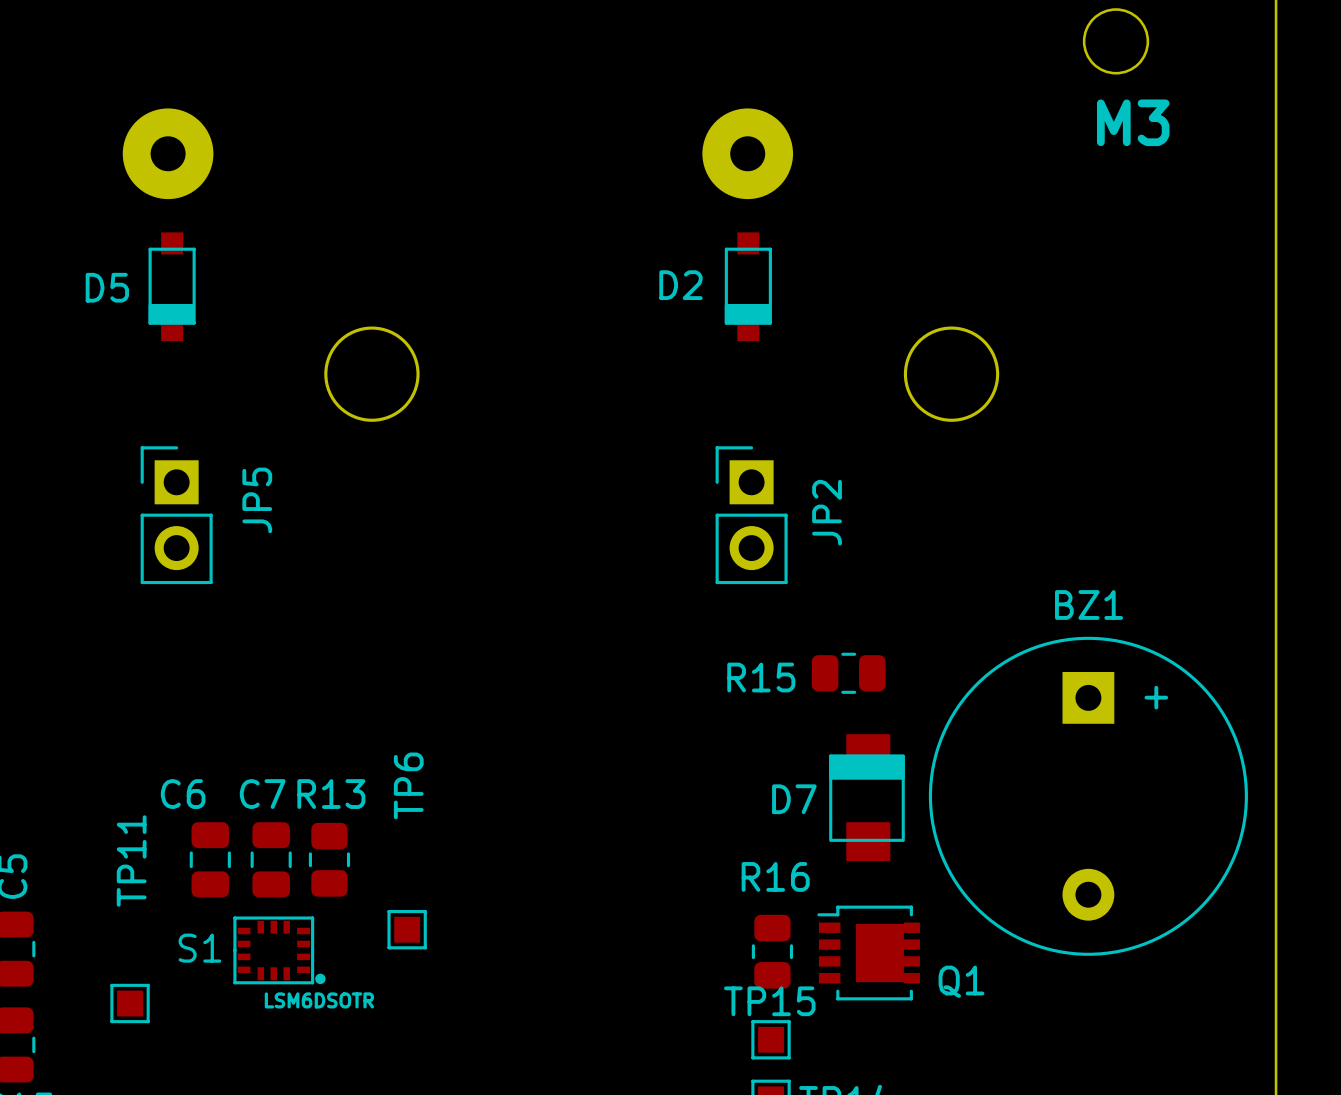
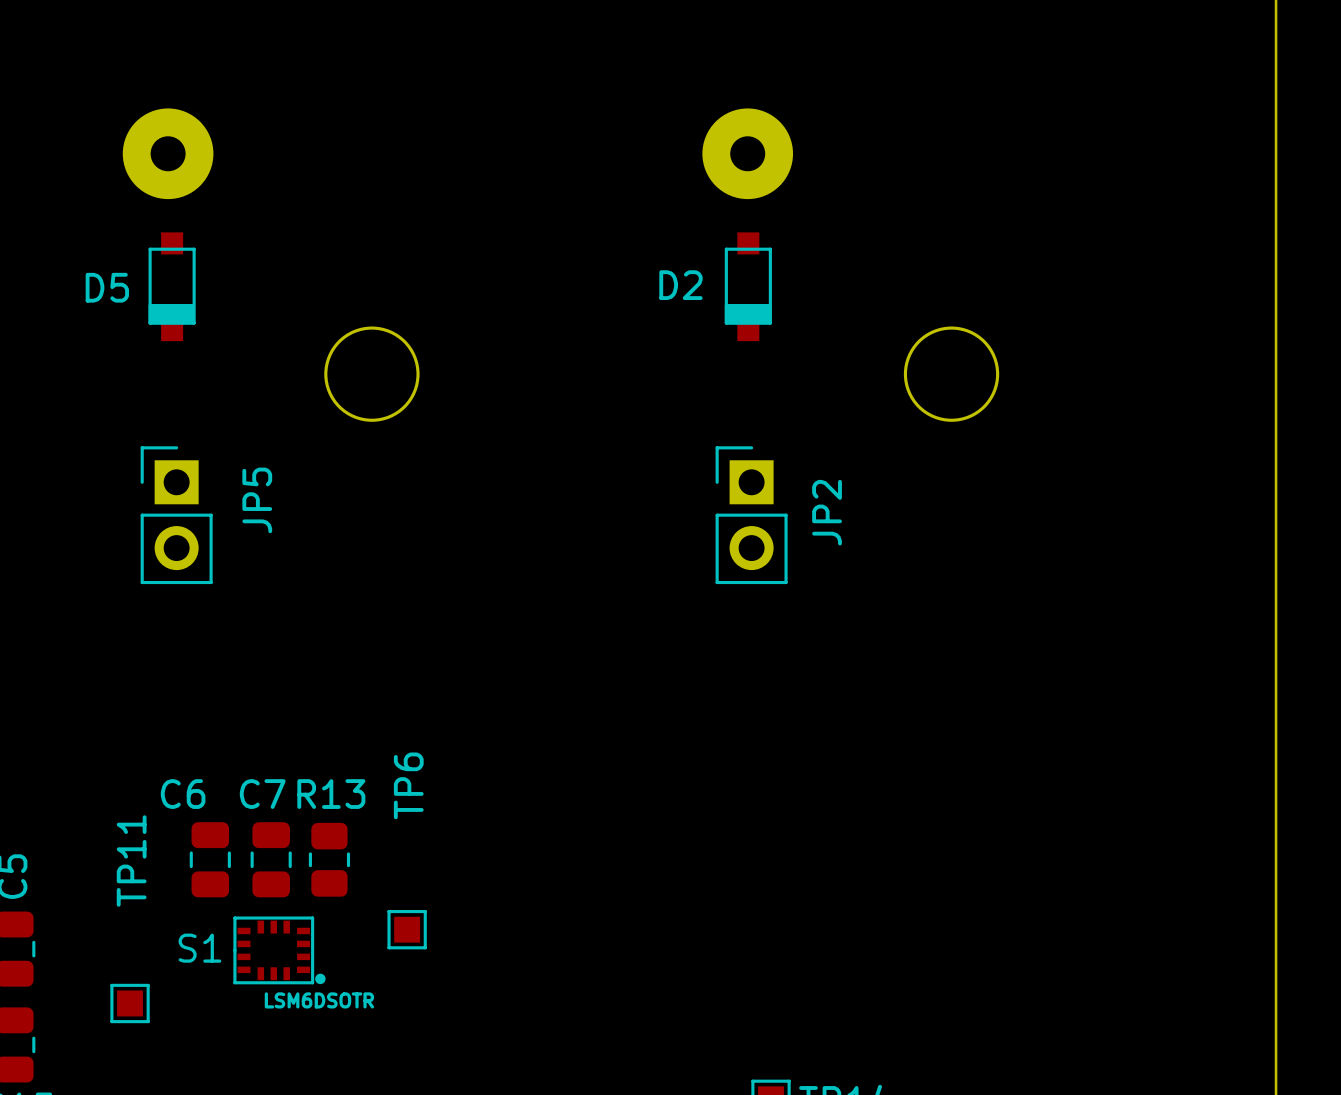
round board edge: [1082, 8, 1150, 75] -> none
text: M3 (1133, 122) -> none
R15: (848, 673) -> none
BZ1: (1088, 796) -> none
D7: (866, 797) -> none
R16: (772, 951) -> none
Q1: (868, 952) -> none
TP15: (771, 1039) -> none

